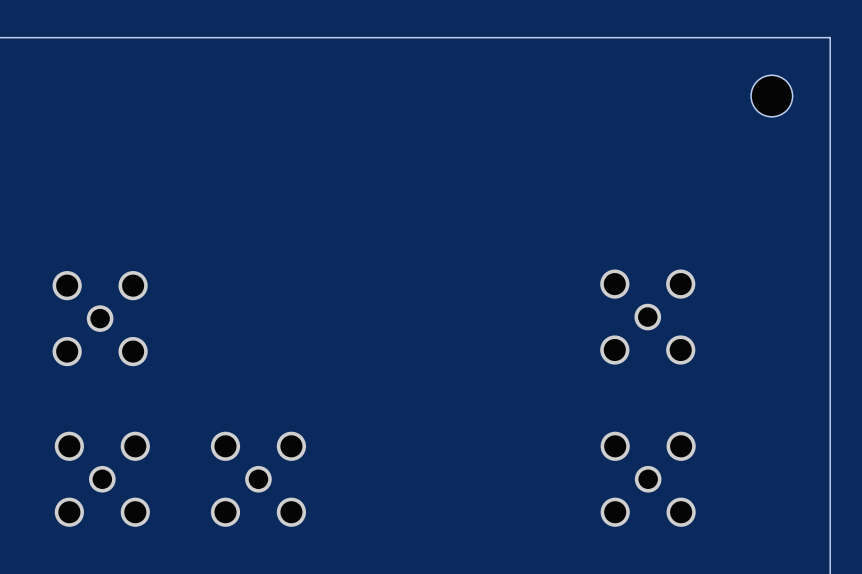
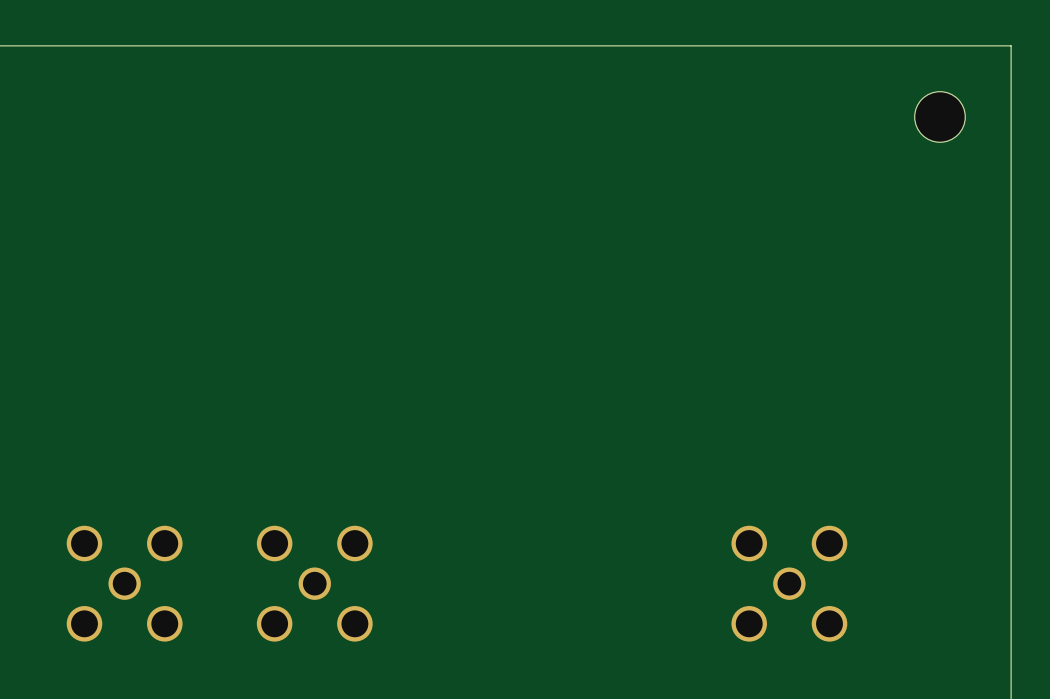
part: (647, 317) -> none
part: (100, 318) -> none

